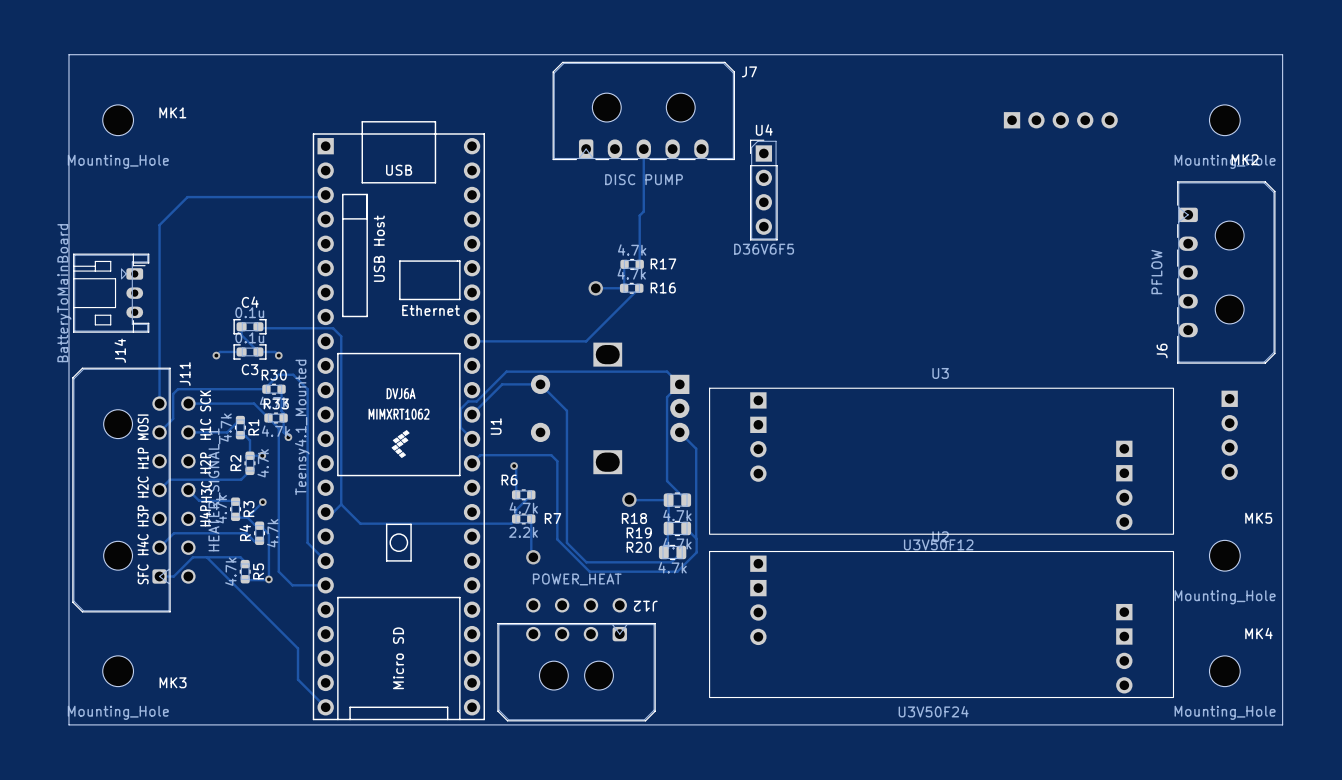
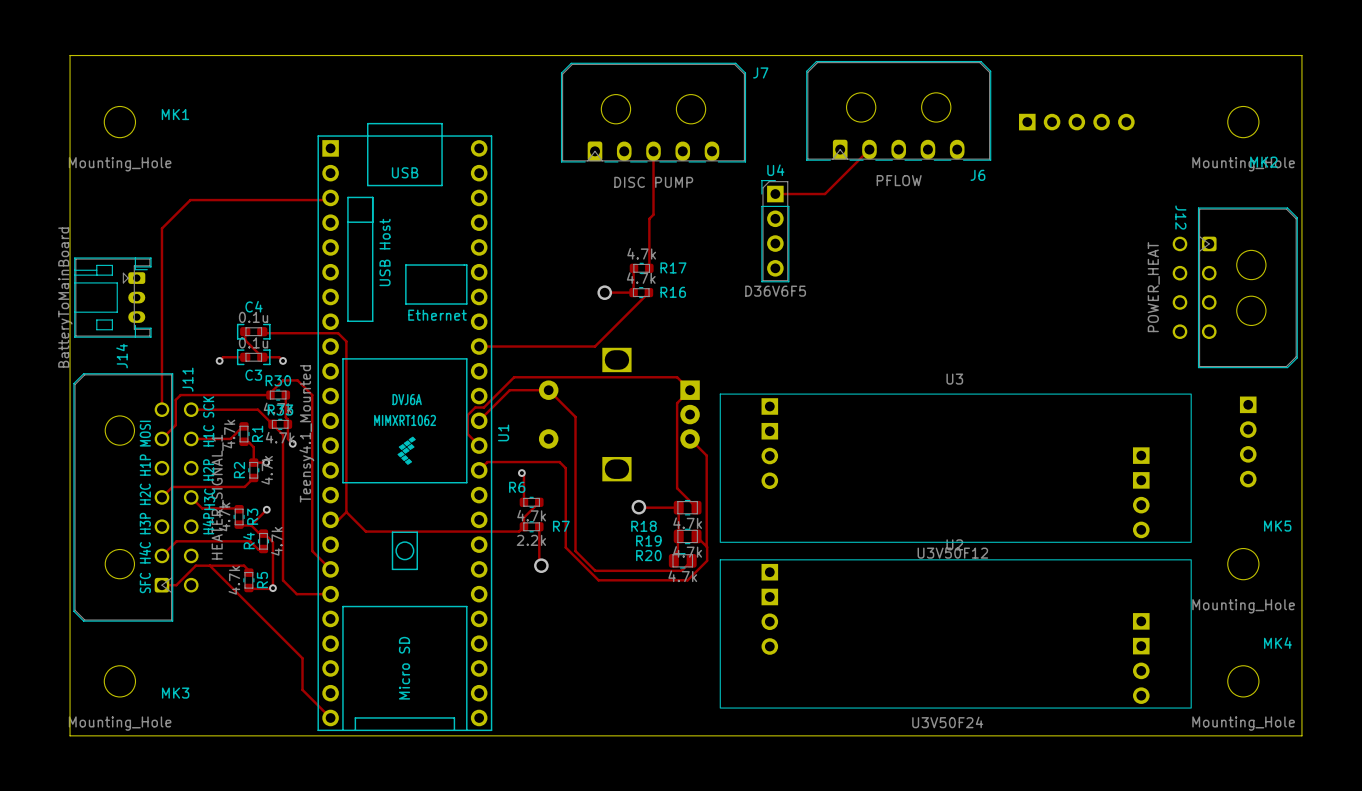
track: none -> (869, 149) (825, 194) (775, 194)
U4 position: (763, 190) -> (775, 231)
J6 rotation: 0° (1226, 272) -> 90° counterclockwise (898, 110)
J6 position: (1226, 272) -> (898, 110)
J12 rotation: 0° (576, 659) -> 90° counterclockwise (1235, 287)
J12 position: (576, 659) -> (1235, 287)

